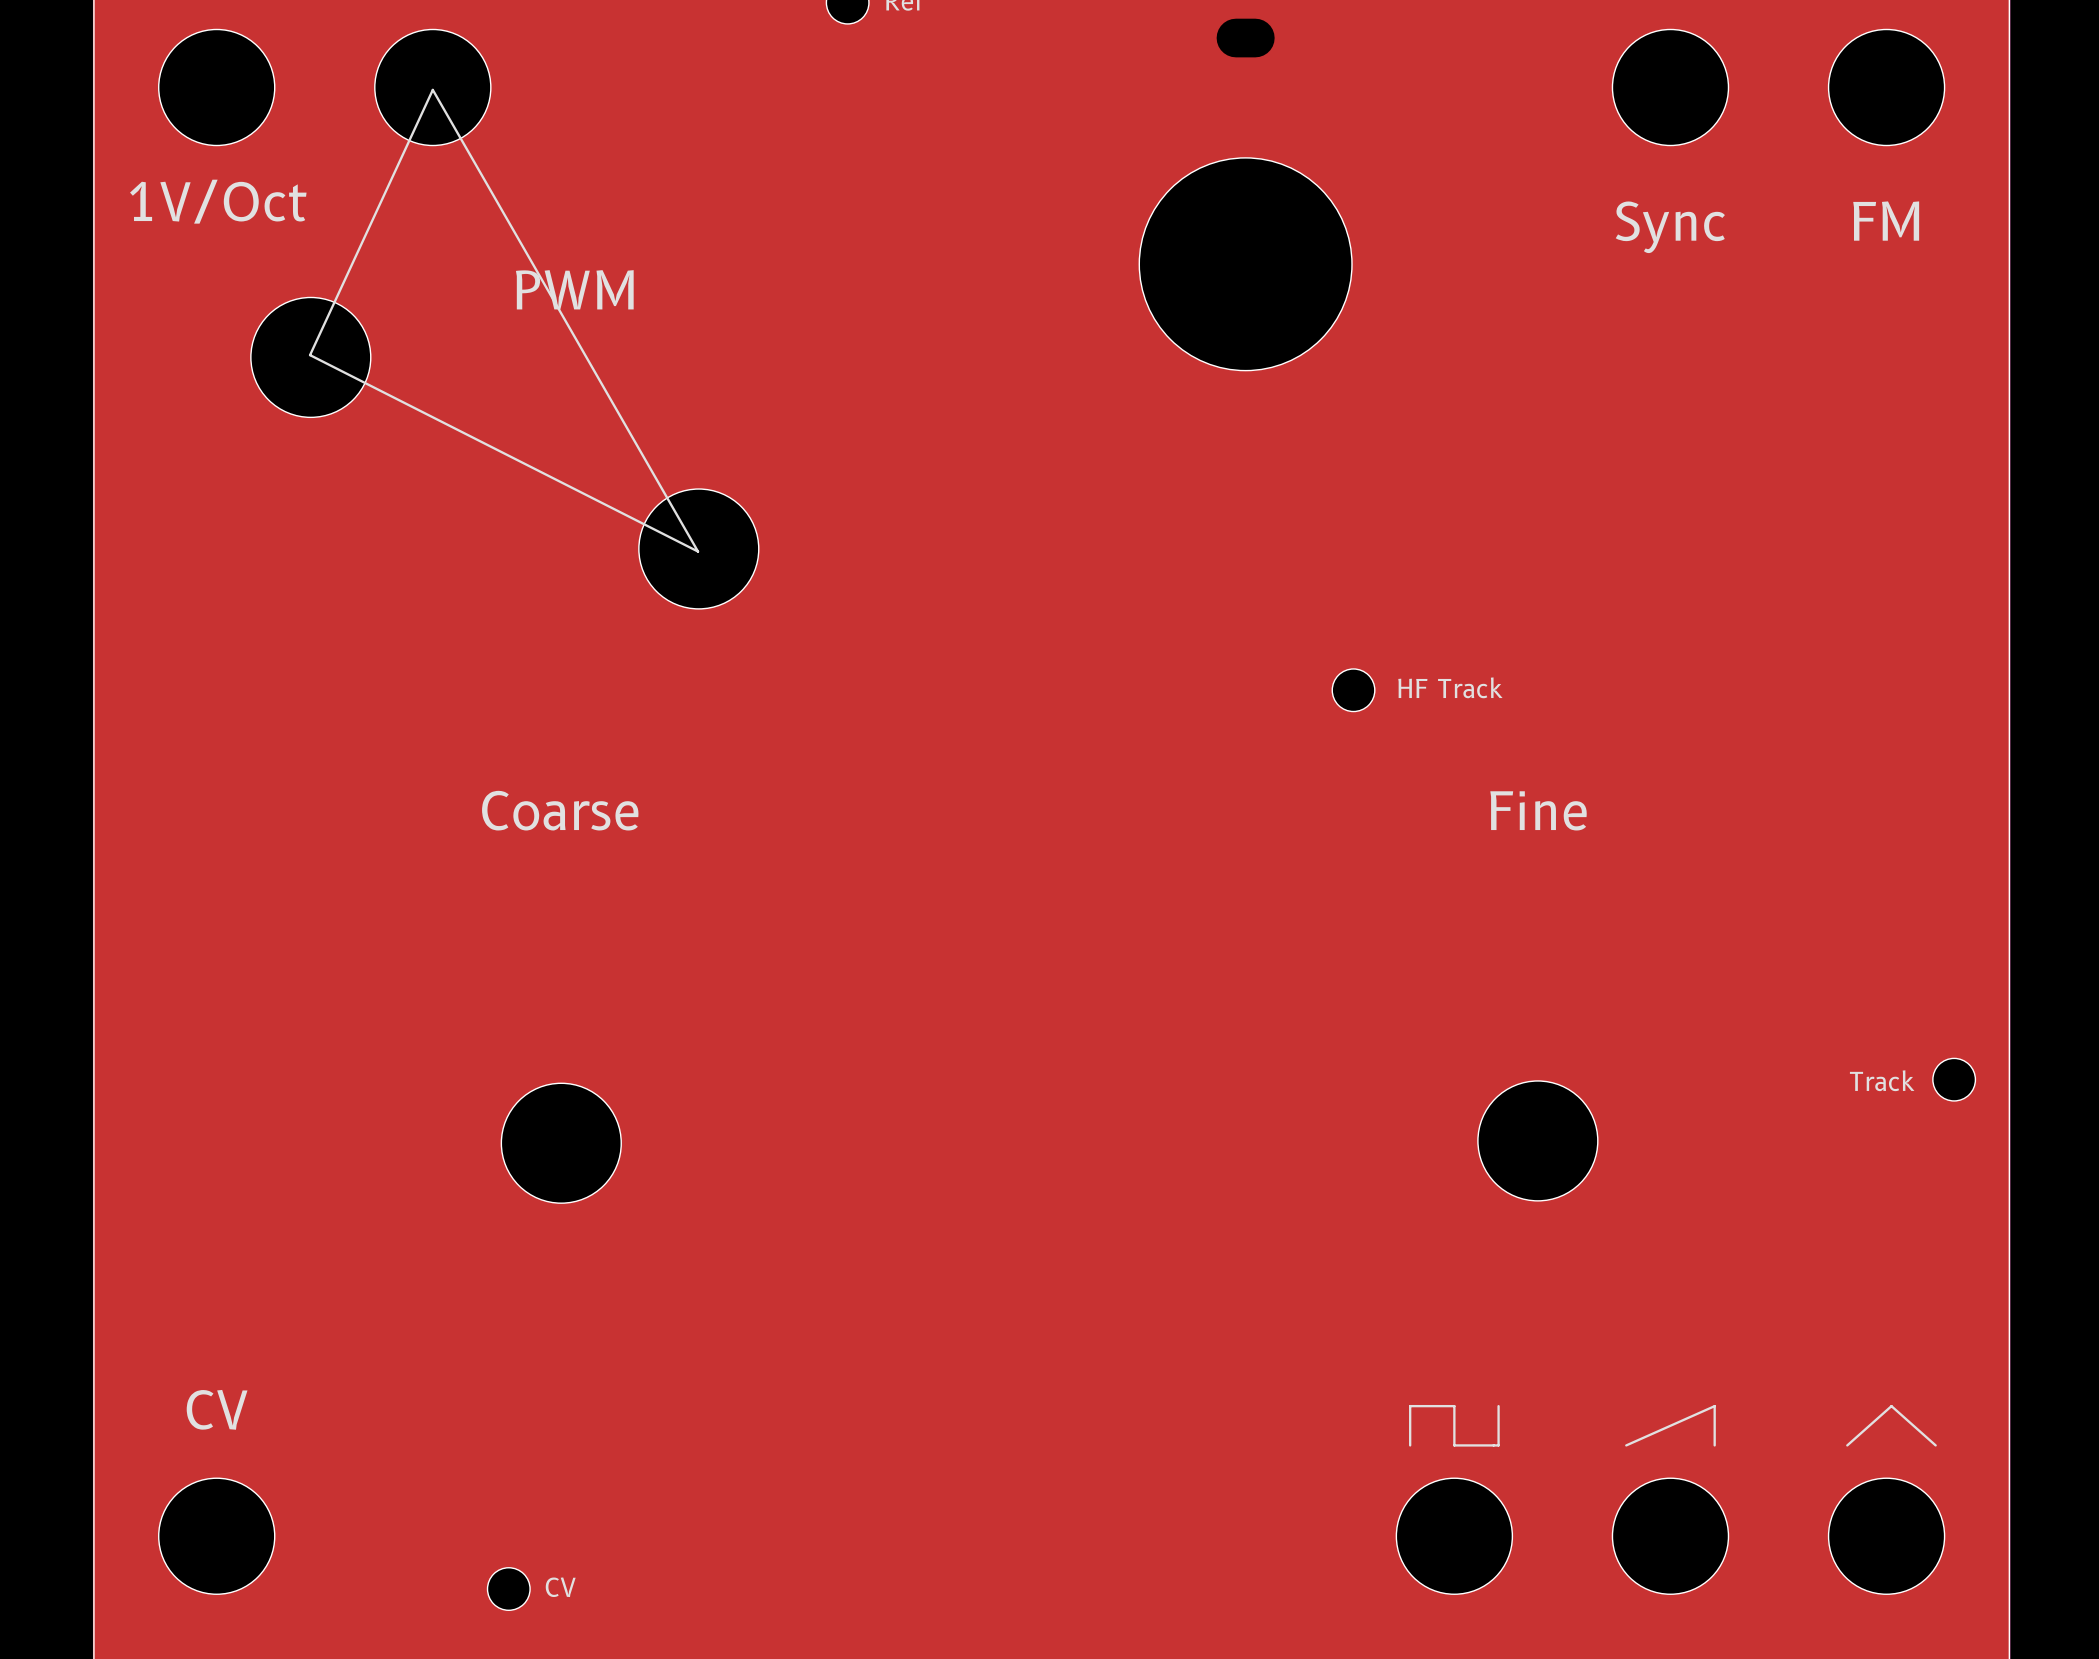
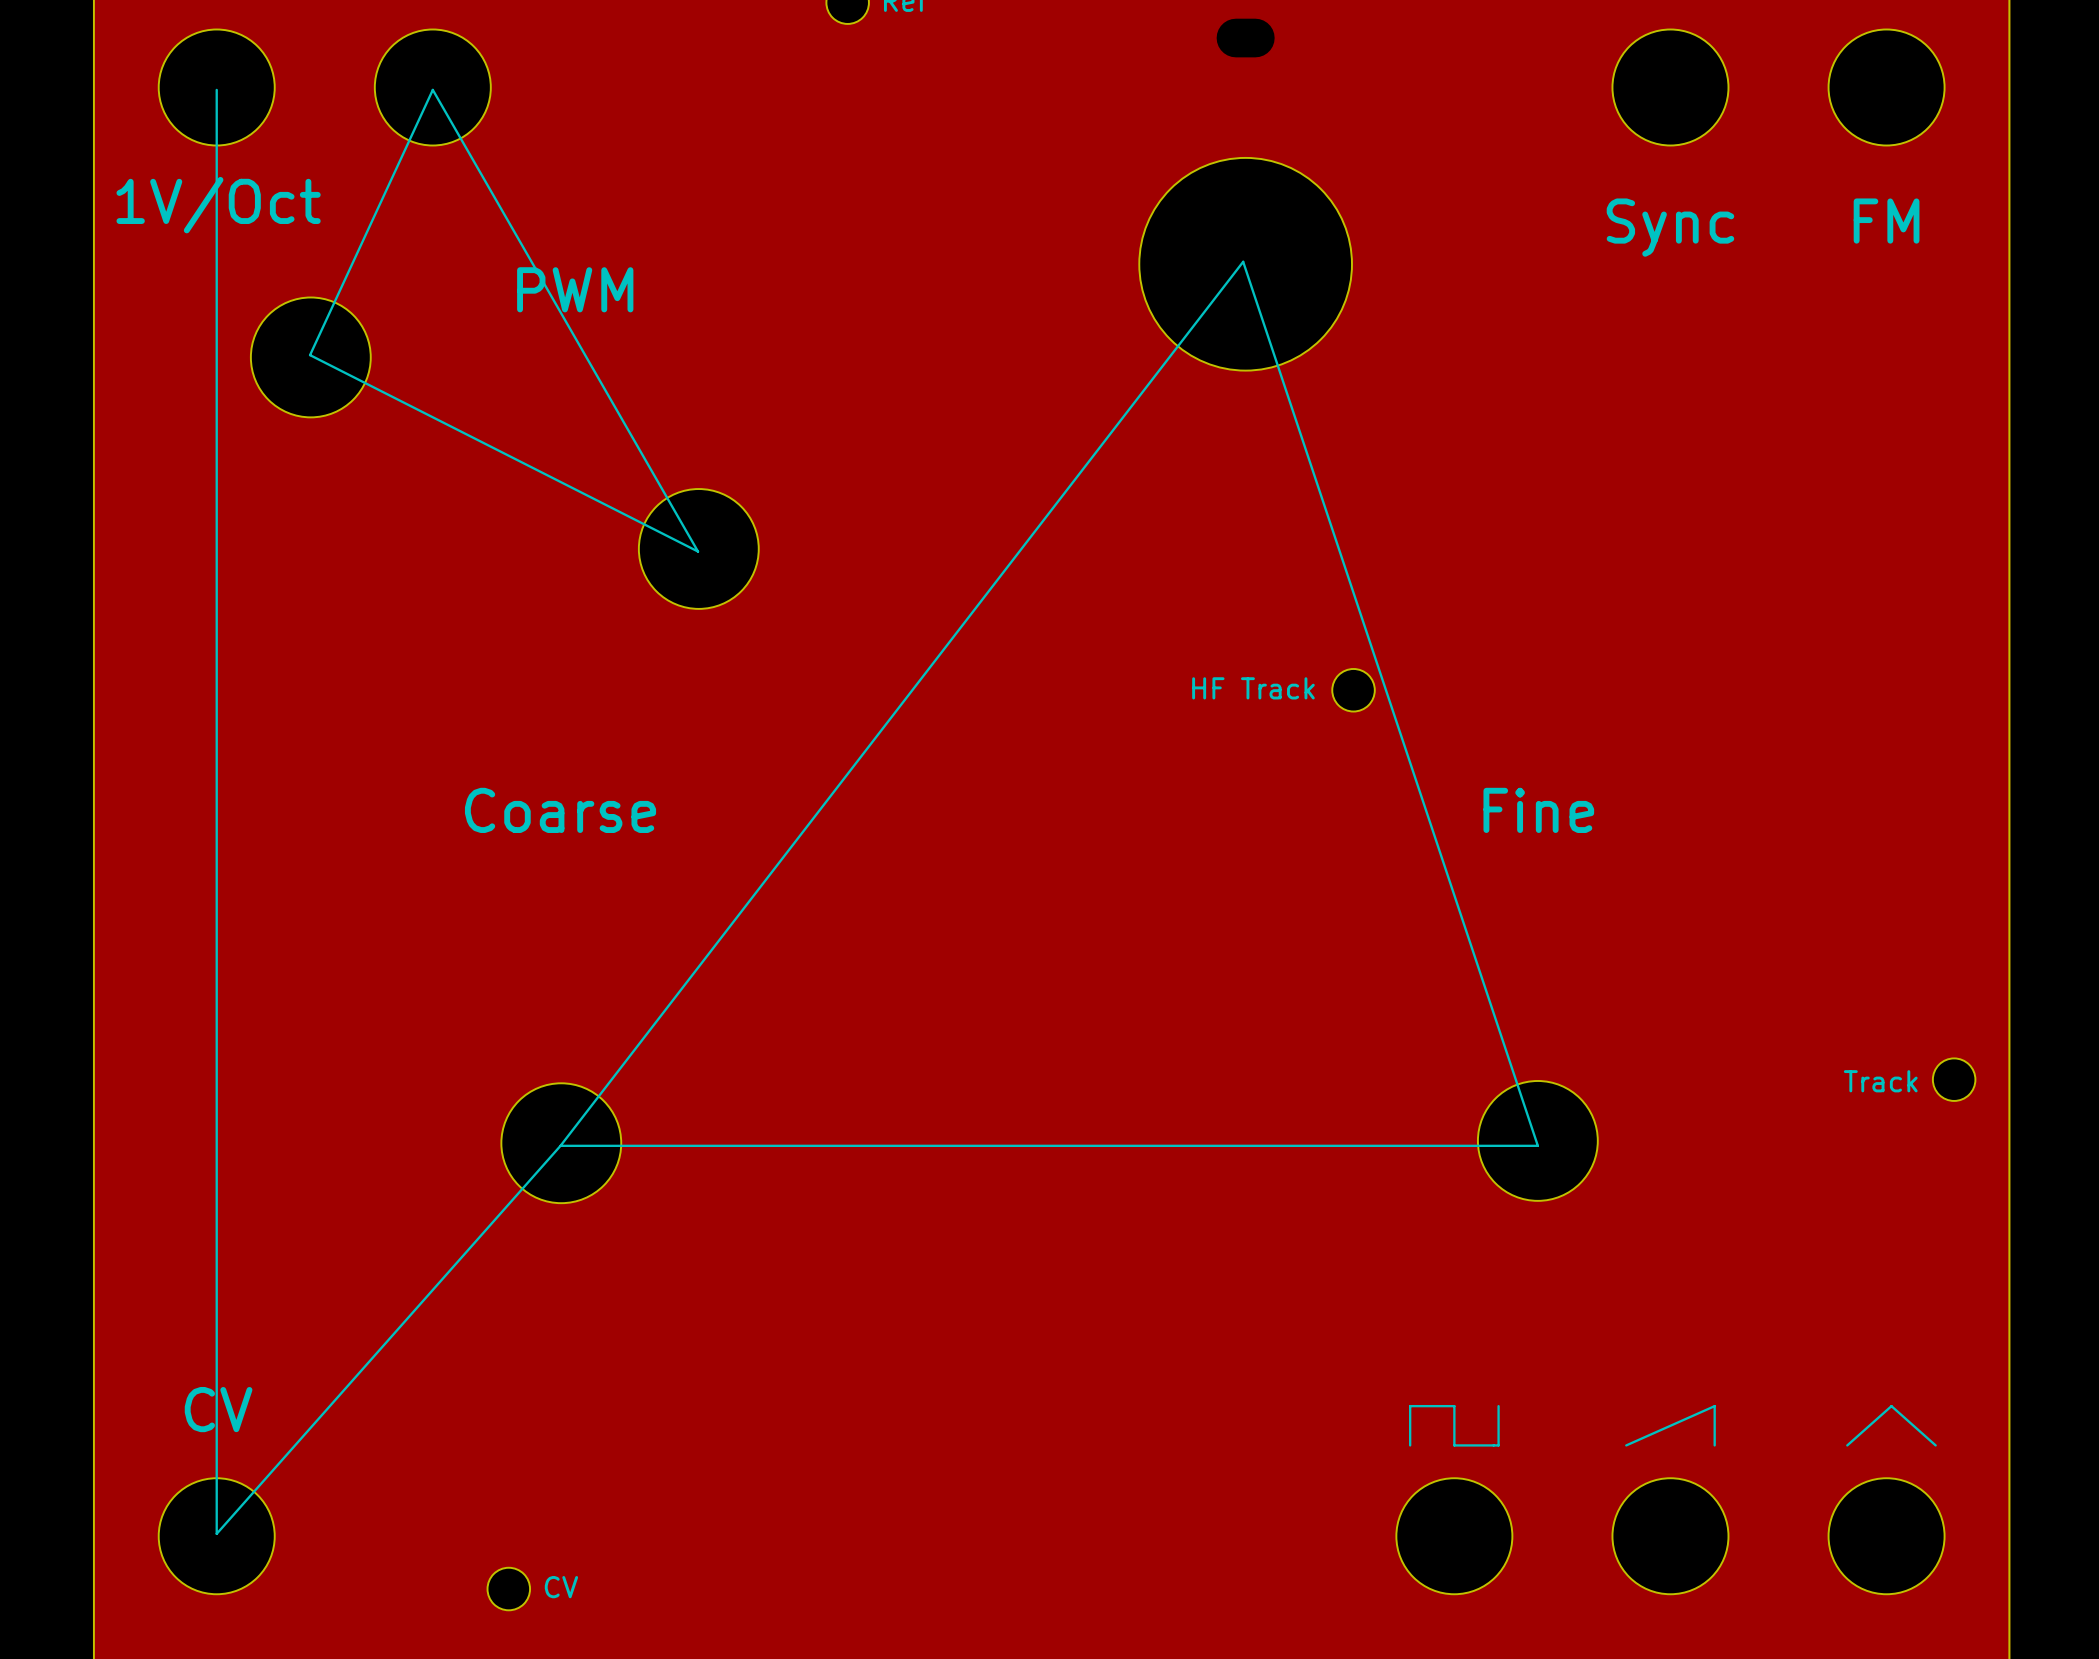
line: none -> (216, 89) (216, 1533) (560, 1145)
text position: HF Track (1450, 687) -> HF Track (1253, 688)
line: none -> (560, 1145) (1243, 261) (1537, 1145) (560, 1145)

